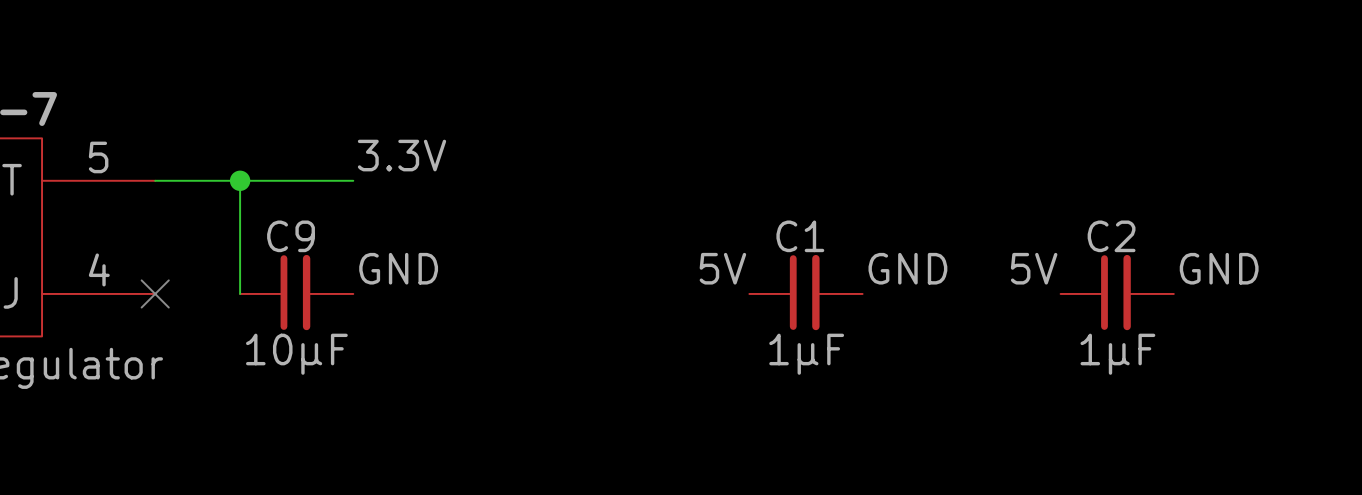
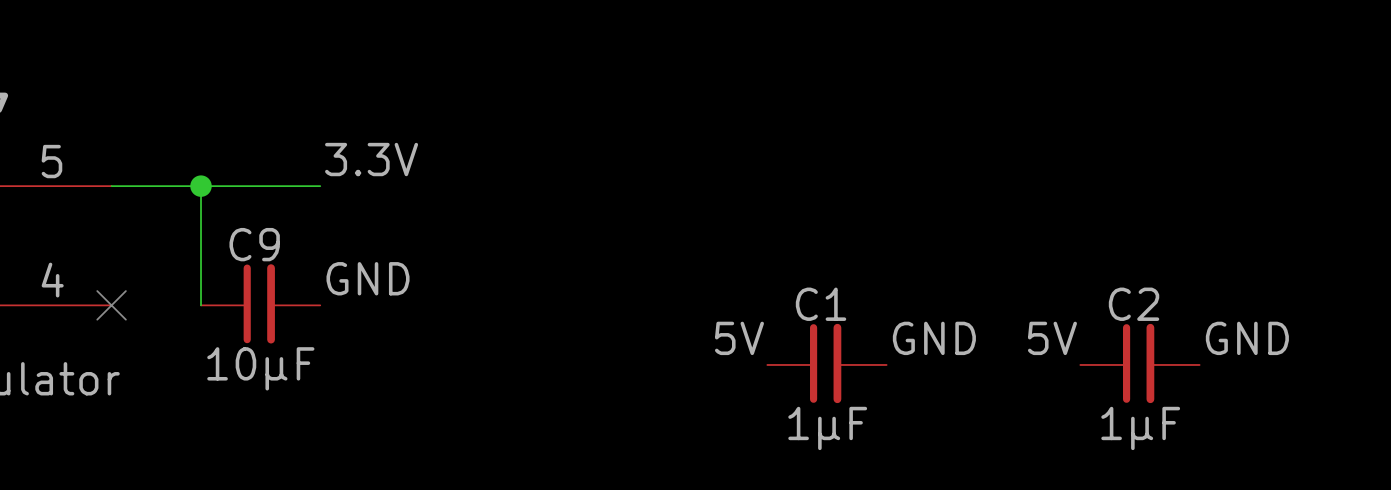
label position: 5V (722, 268) -> 5V (739, 338)
label position: GND (907, 268) -> GND (934, 338)
label position: 5V (1034, 268) -> 5V (1052, 338)
label position: GND (1219, 268) -> GND (1247, 338)
C1 position: (805, 292) -> (826, 363)
C2 position: (1117, 292) -> (1139, 363)

